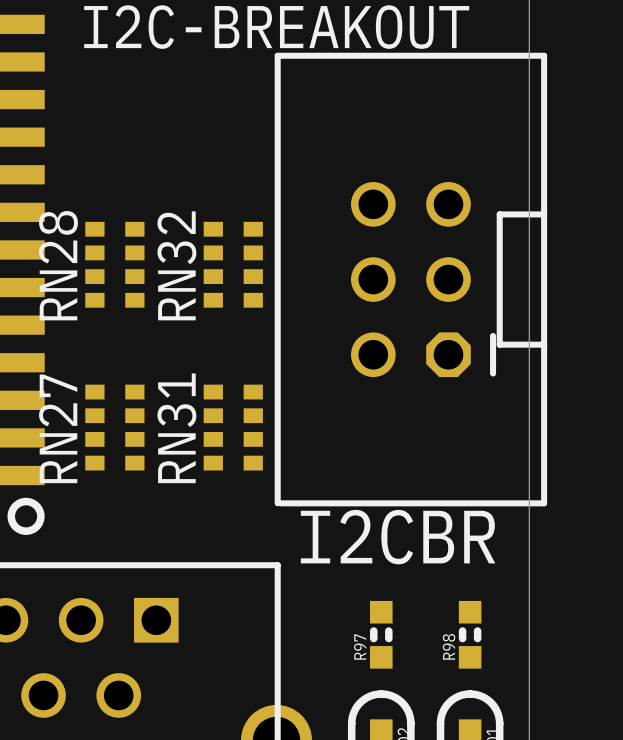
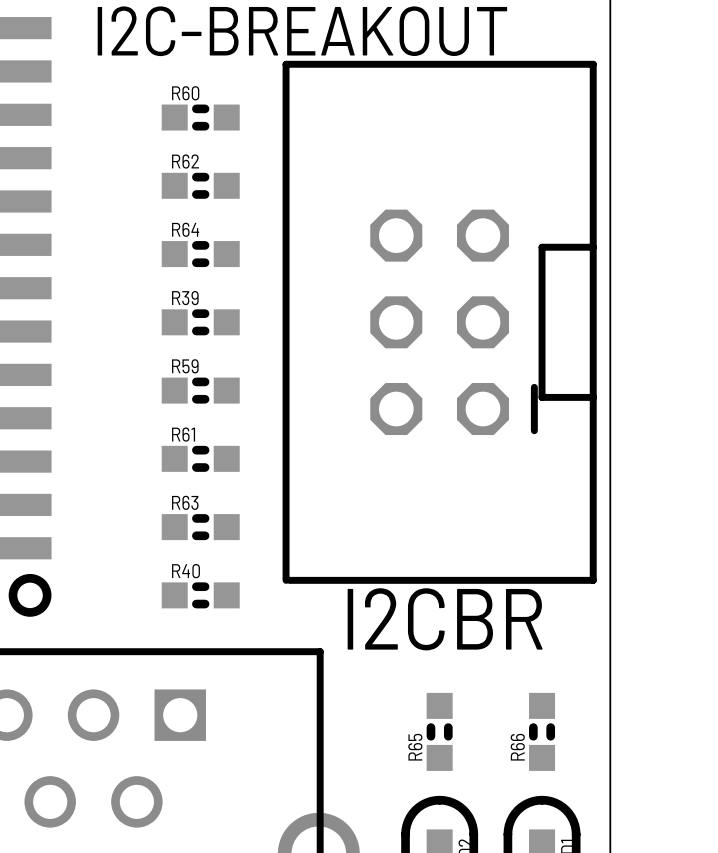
part footprint: [274, 52, 548, 507] -> [282, 60, 597, 584]
R60: none -> (200, 117)
R62: none -> (200, 185)
R64: none -> (200, 254)
RN28: (114, 264) -> none
RN32: (233, 264) -> none
R39: none -> (200, 322)
R59: none -> (200, 390)
R61: none -> (200, 458)
RN27: (114, 427) -> none
RN31: (233, 427) -> none
R63: none -> (200, 527)
R40: none -> (200, 595)
R97 name: R97 (360, 646) -> R65 (415, 747)
R98 name: R98 (449, 646) -> R66 (517, 747)

